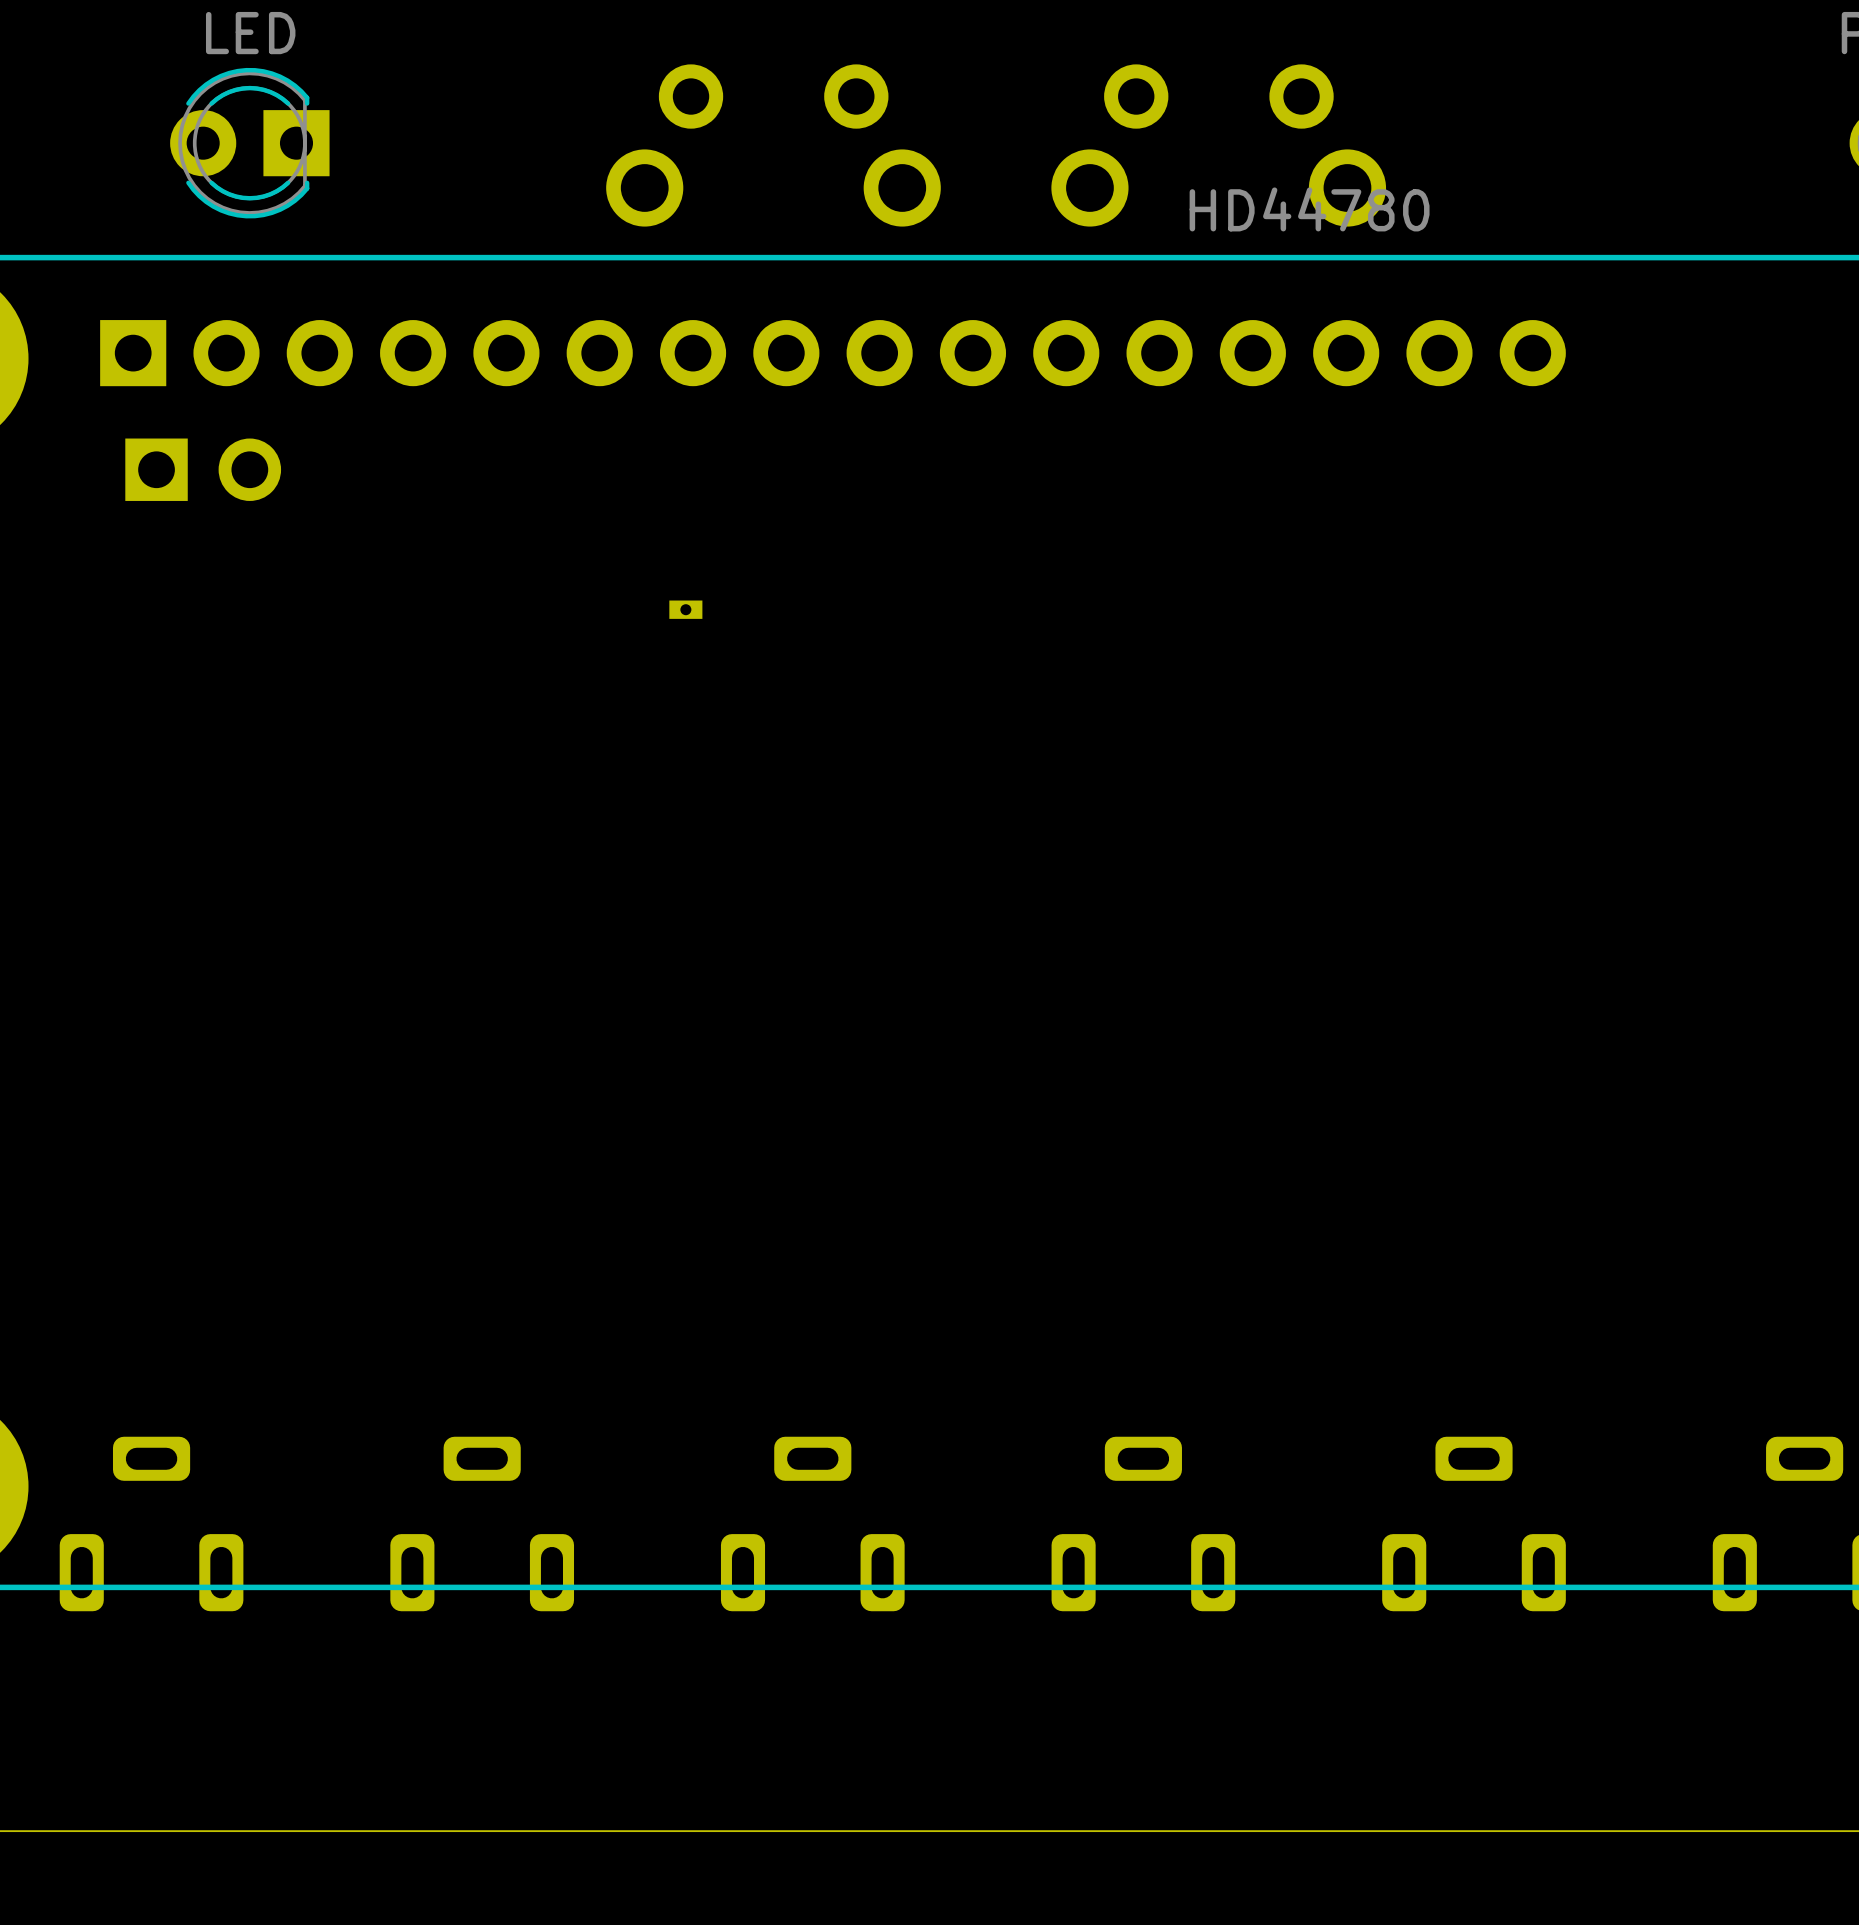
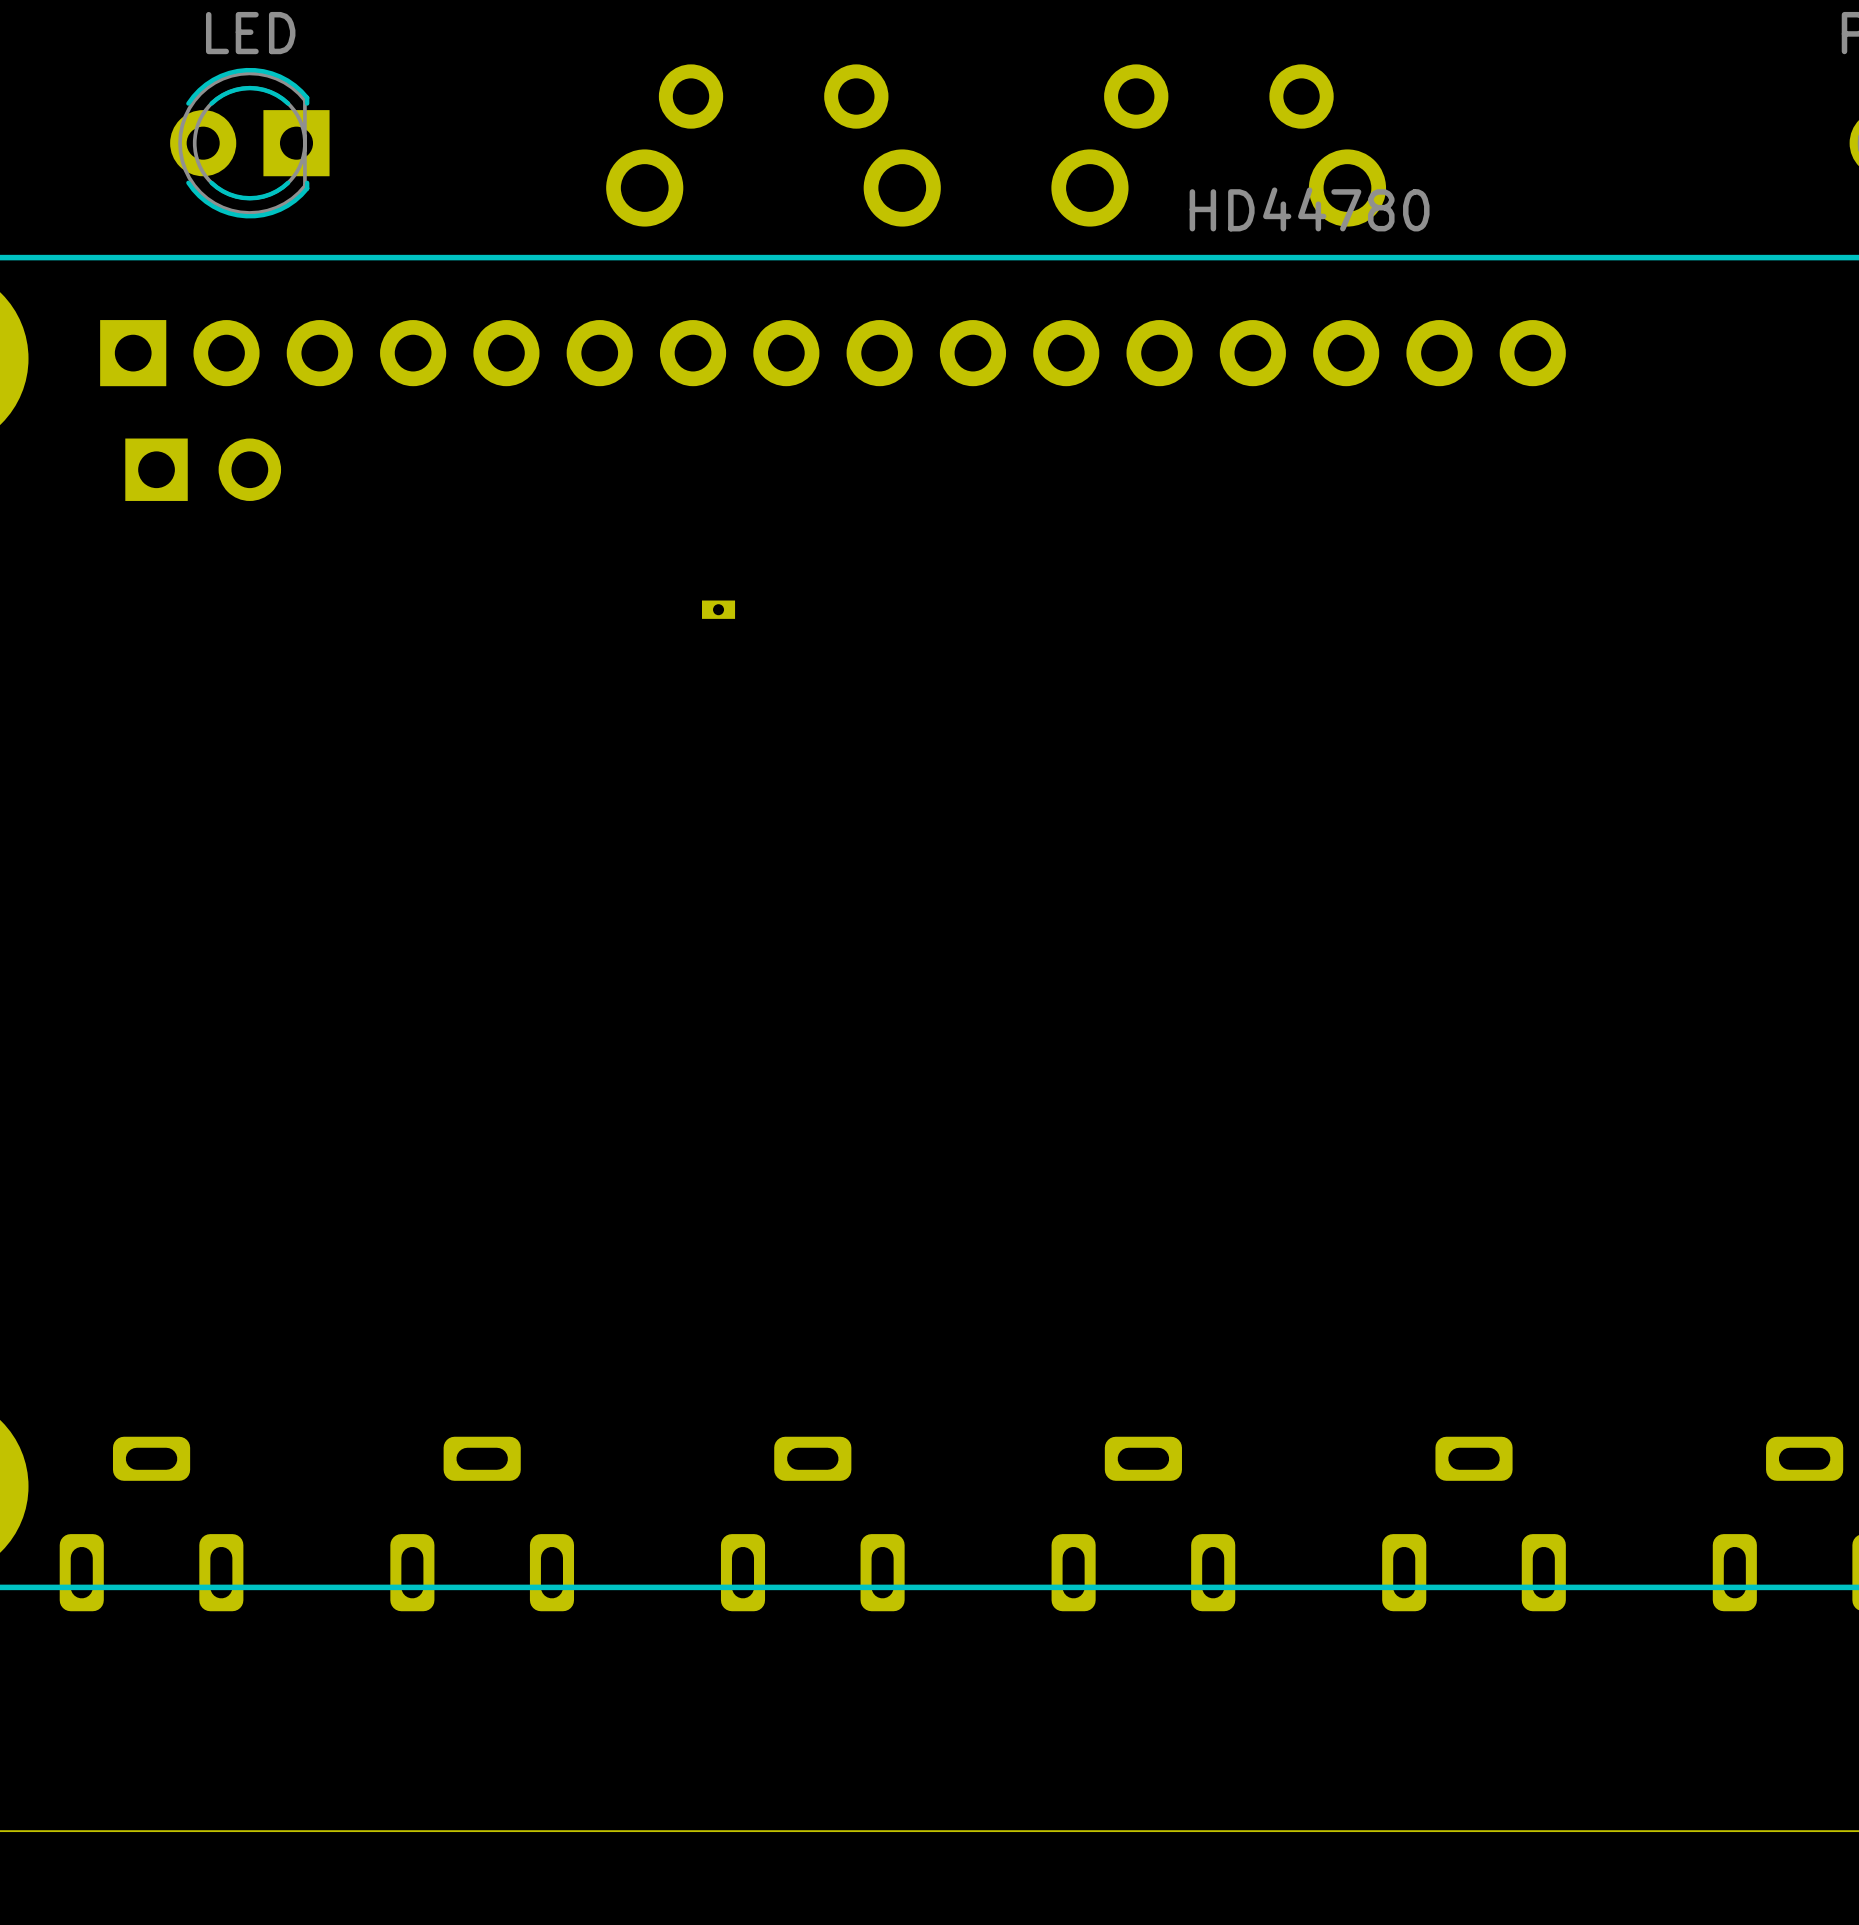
part position: (685, 609) -> (718, 609)

